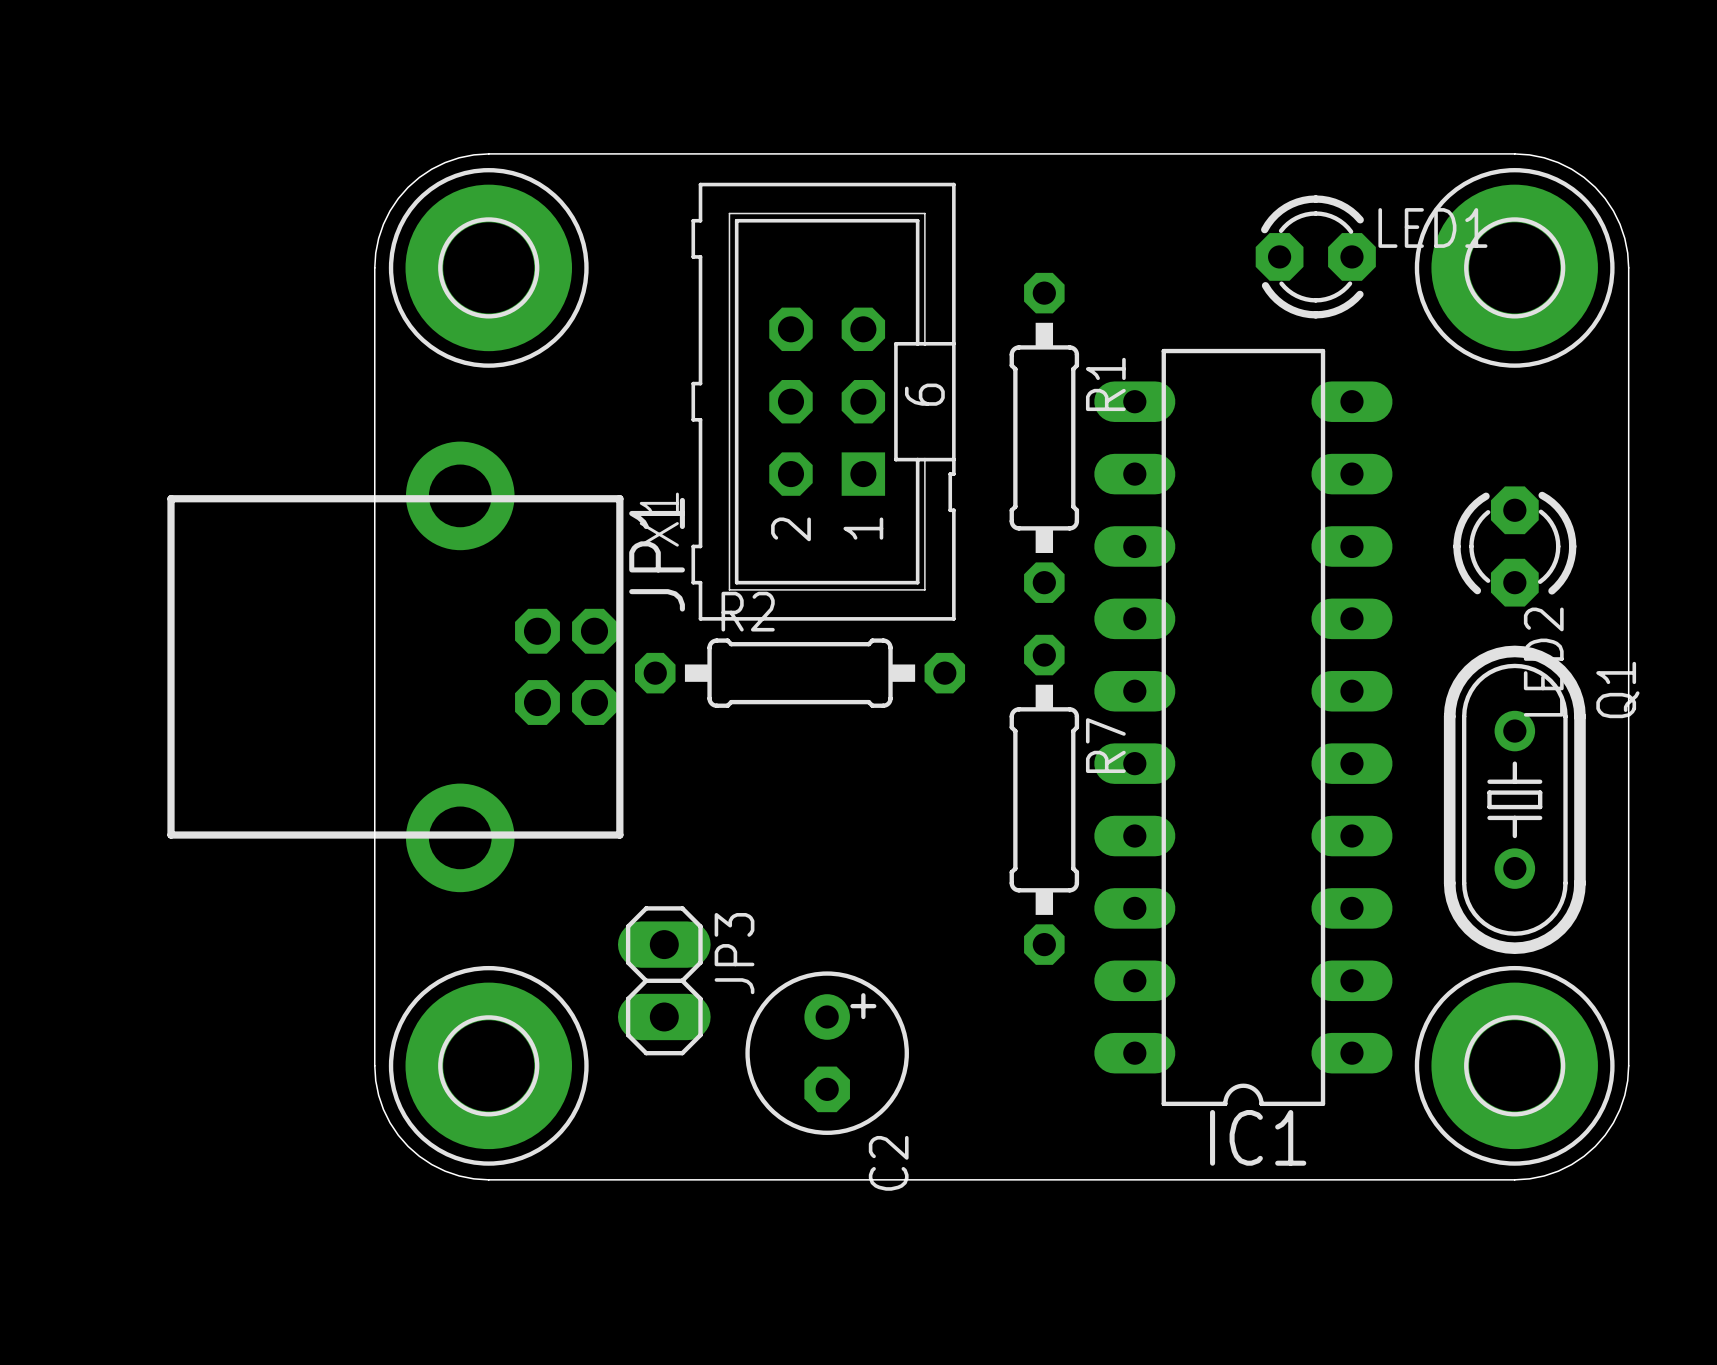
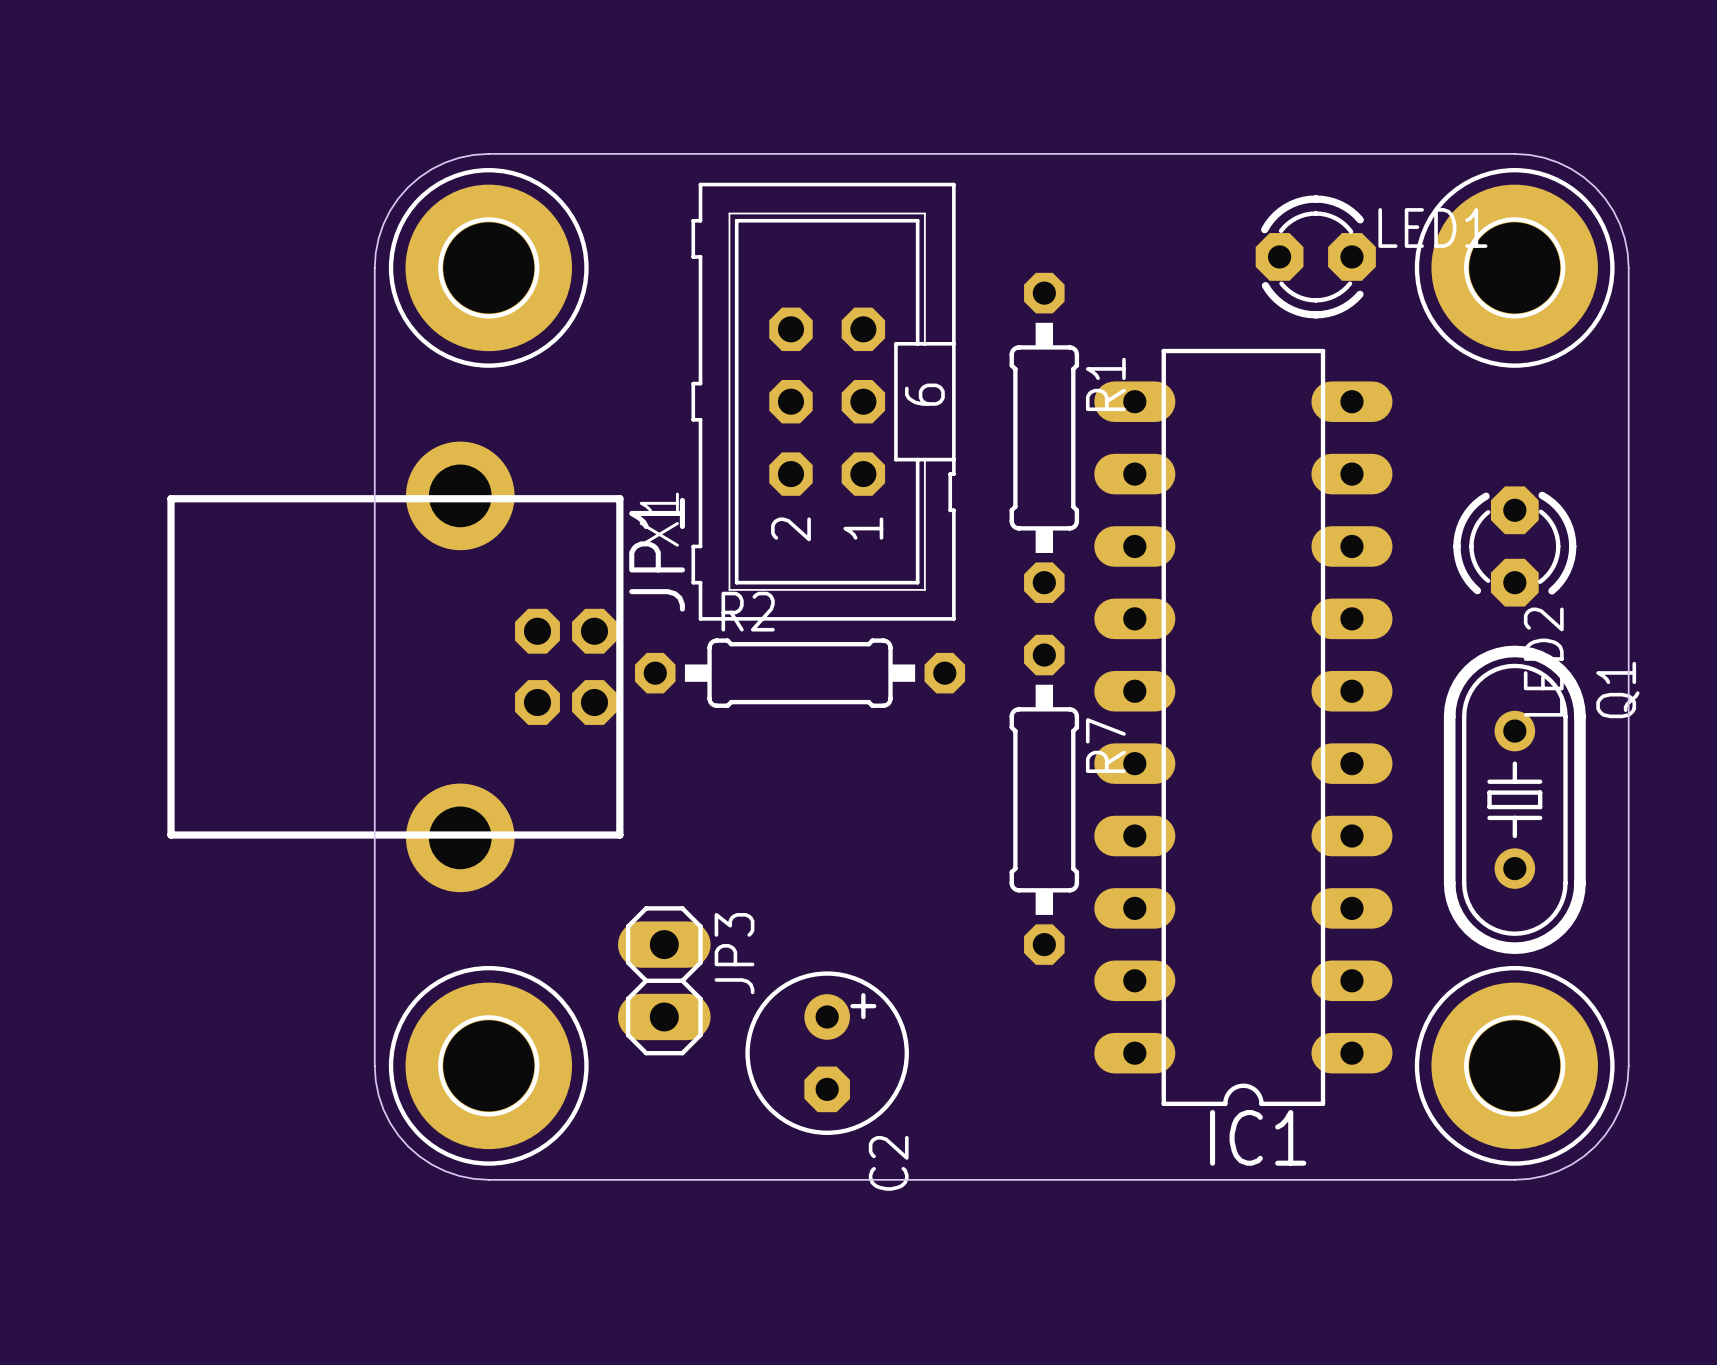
JP1 footprint: [691, 182, 956, 621] -> [691, 182, 956, 621]

